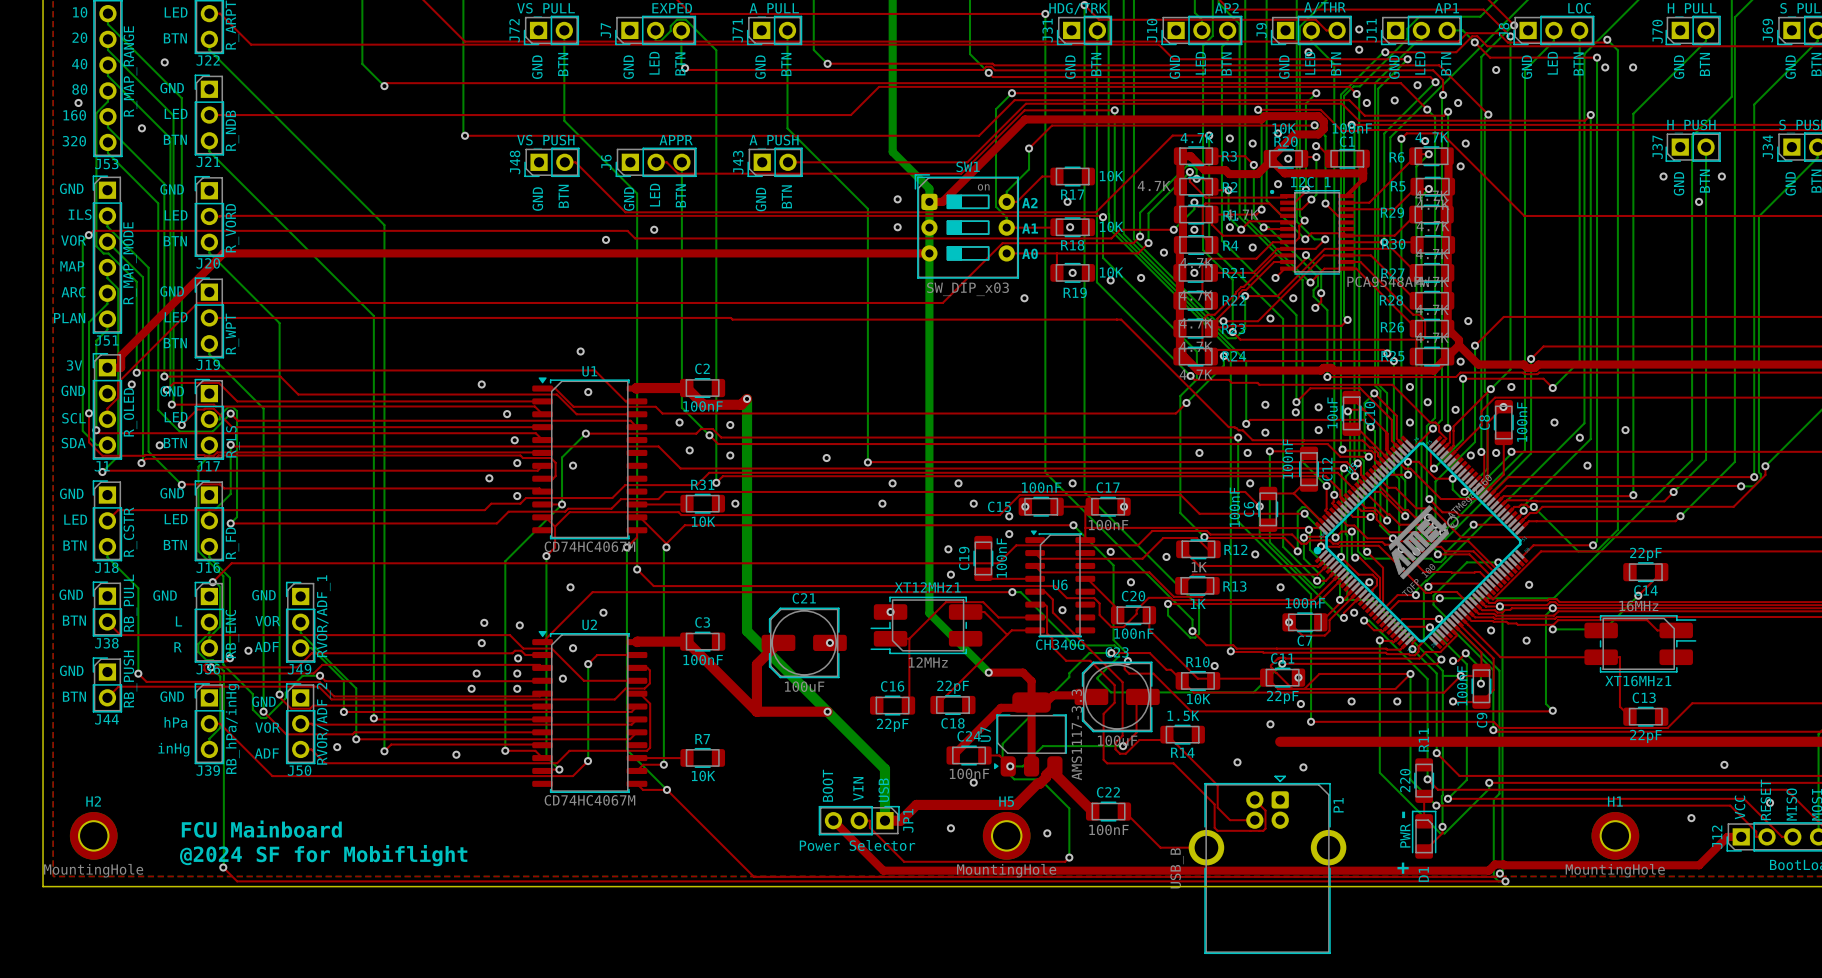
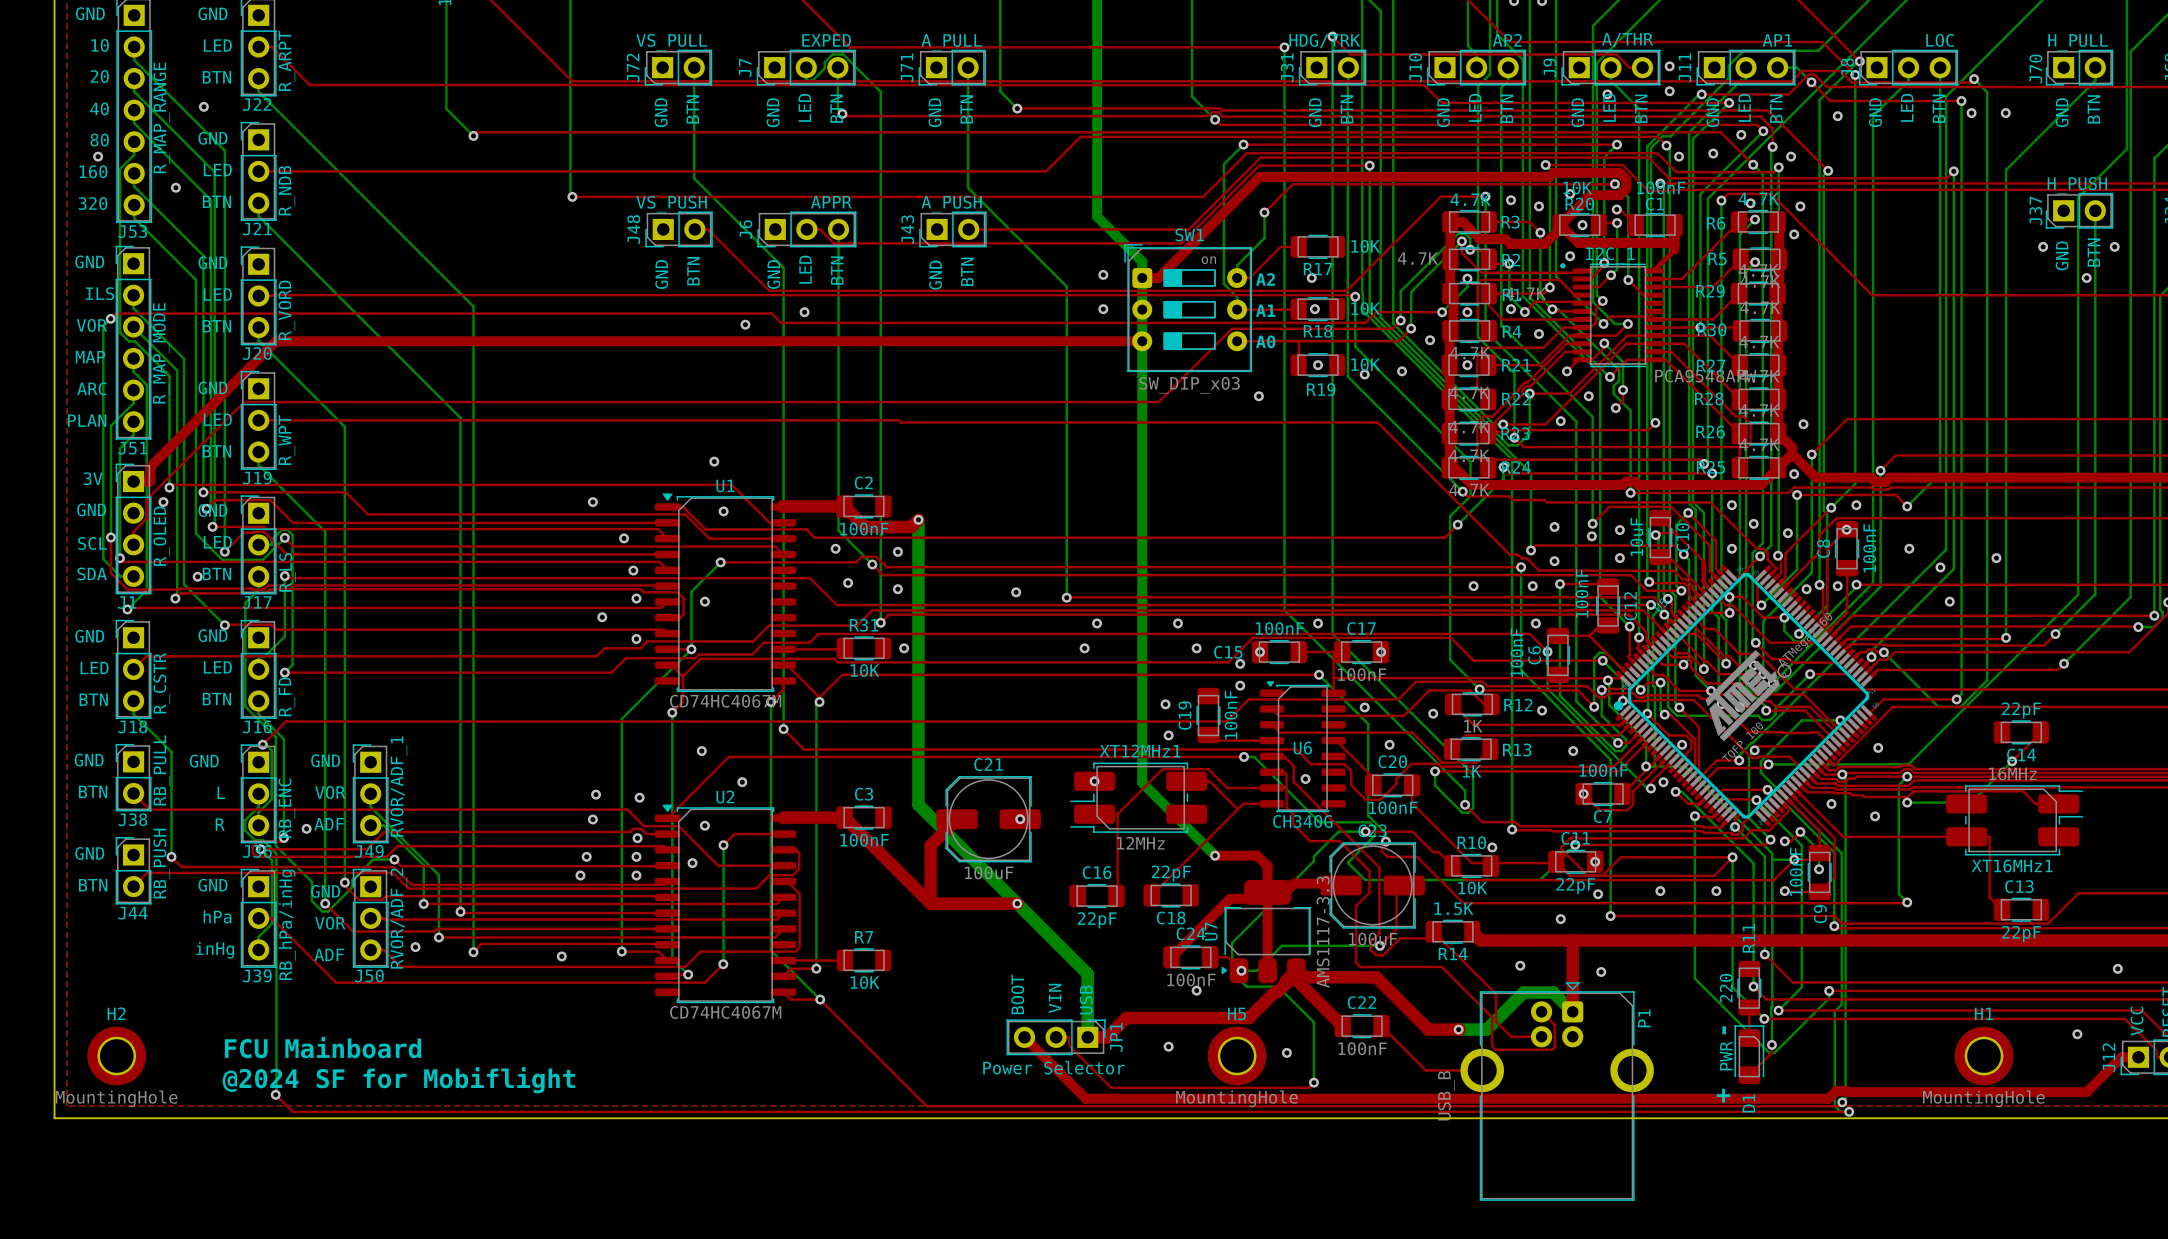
top track: none -> (1472, 931) (1480, 940) (1572, 940) (1572, 1011)
top track: none -> (1296, 970) (1302, 977) (1376, 977) (1428, 1029) (1459, 1029)
bottom track: none -> (1572, 1011) (1553, 992) (1523, 992) (1486, 1029) (1459, 1029)
via: none -> (1458, 1029)

